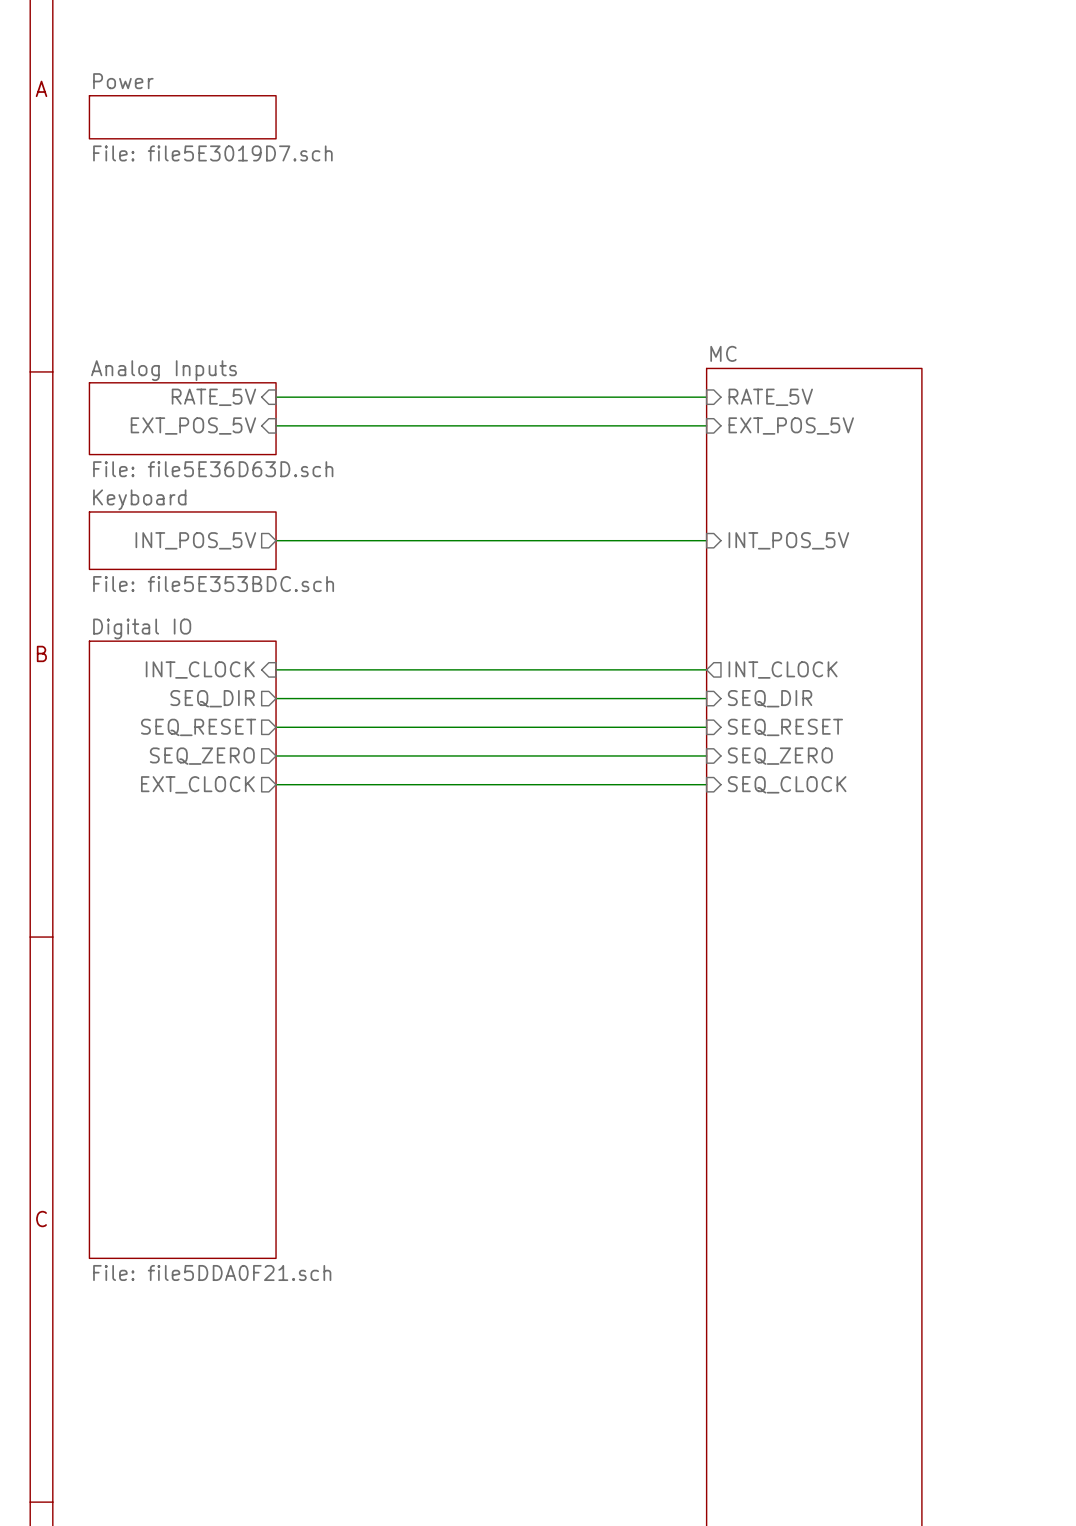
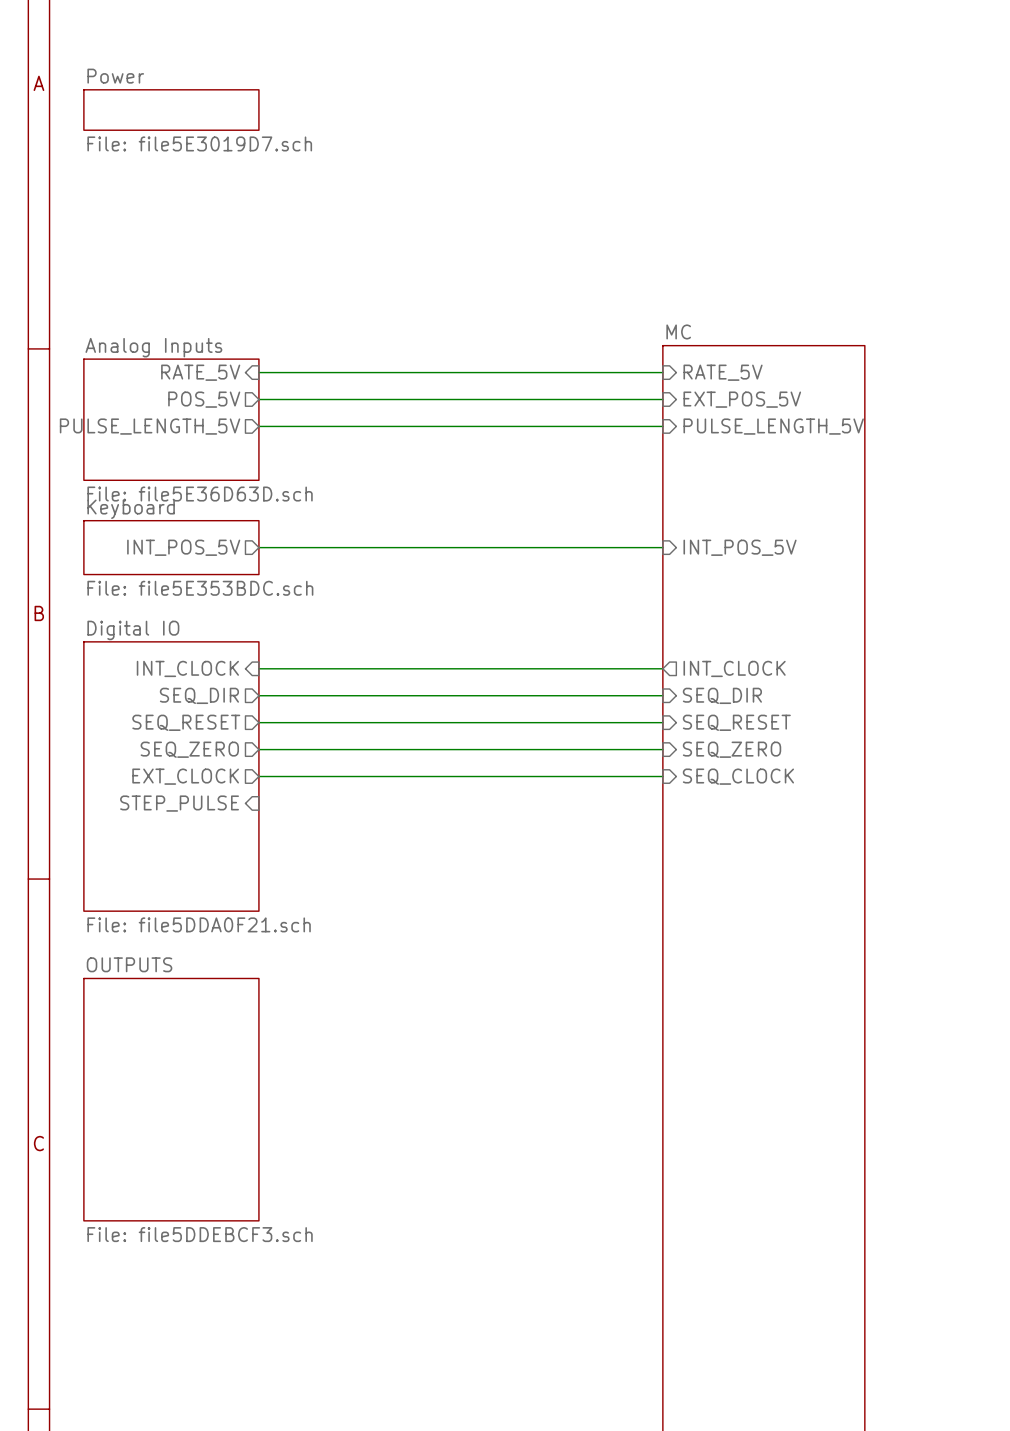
sheet Analog Inputs: File: file5E36D63D.sch (182, 418) -> none
sheet pin shape: input (193, 426) -> output (204, 399)
sheet pin: EXT_POS_5V (193, 426) -> POS_5V (204, 399)
sheet Analog Inputs: none -> File: file5E36D63D.sch (171, 419)
sheet pin: none -> PULSE_LENGTH_5V (150, 426)
wire: none -> (258, 426) (662, 426)
sheet pin: none -> PULSE_LENGTH_5V (773, 426)
sheet Keyboard position: (182, 540) -> (171, 547)
sheet pin position: INT_POS_5V (195, 540) -> INT_POS_5V (183, 547)
wire: (276, 540) (706, 540) -> (258, 547) (662, 547)
sheet pin position: INT_POS_5V (788, 540) -> INT_POS_5V (740, 547)
wire: (276, 669) (706, 669) -> (258, 668) (662, 668)
sheet pin position: INT_CLOCK (200, 670) -> INT_CLOCK (187, 668)
sheet pin position: INT_CLOCK (783, 670) -> INT_CLOCK (734, 668)
sheet pin position: SEQ_DIR (212, 698) -> SEQ_DIR (199, 695)
wire: (276, 698) (706, 698) -> (258, 695) (662, 695)
sheet pin position: SEQ_DIR (770, 698) -> SEQ_DIR (722, 695)
sheet pin position: SEQ_RESET (198, 727) -> SEQ_RESET (186, 722)
wire: (276, 727) (706, 727) -> (258, 722) (662, 722)
sheet pin position: SEQ_RESET (785, 727) -> SEQ_RESET (736, 722)
wire: (276, 755) (706, 755) -> (258, 749) (662, 749)
sheet pin position: SEQ_ZERO (202, 756) -> SEQ_ZERO (189, 749)
sheet pin position: SEQ_ZERO (780, 756) -> SEQ_ZERO (732, 749)
sheet pin position: EXT_CLOCK (197, 784) -> EXT_CLOCK (185, 776)
wire: (276, 784) (706, 784) -> (258, 776) (662, 776)
sheet pin position: SEQ_CLOCK (787, 784) -> SEQ_CLOCK (738, 776)
sheet Digital IO: none -> File: file5DDA0F21.sch (171, 776)
sheet pin: none -> STEP_PULSE (179, 803)
sheet Digital IO: File: file5DDA0F21.sch (182, 949) -> none
sheet OUTPUTS: none -> File: file5DDEBCF3.sch (171, 1099)

